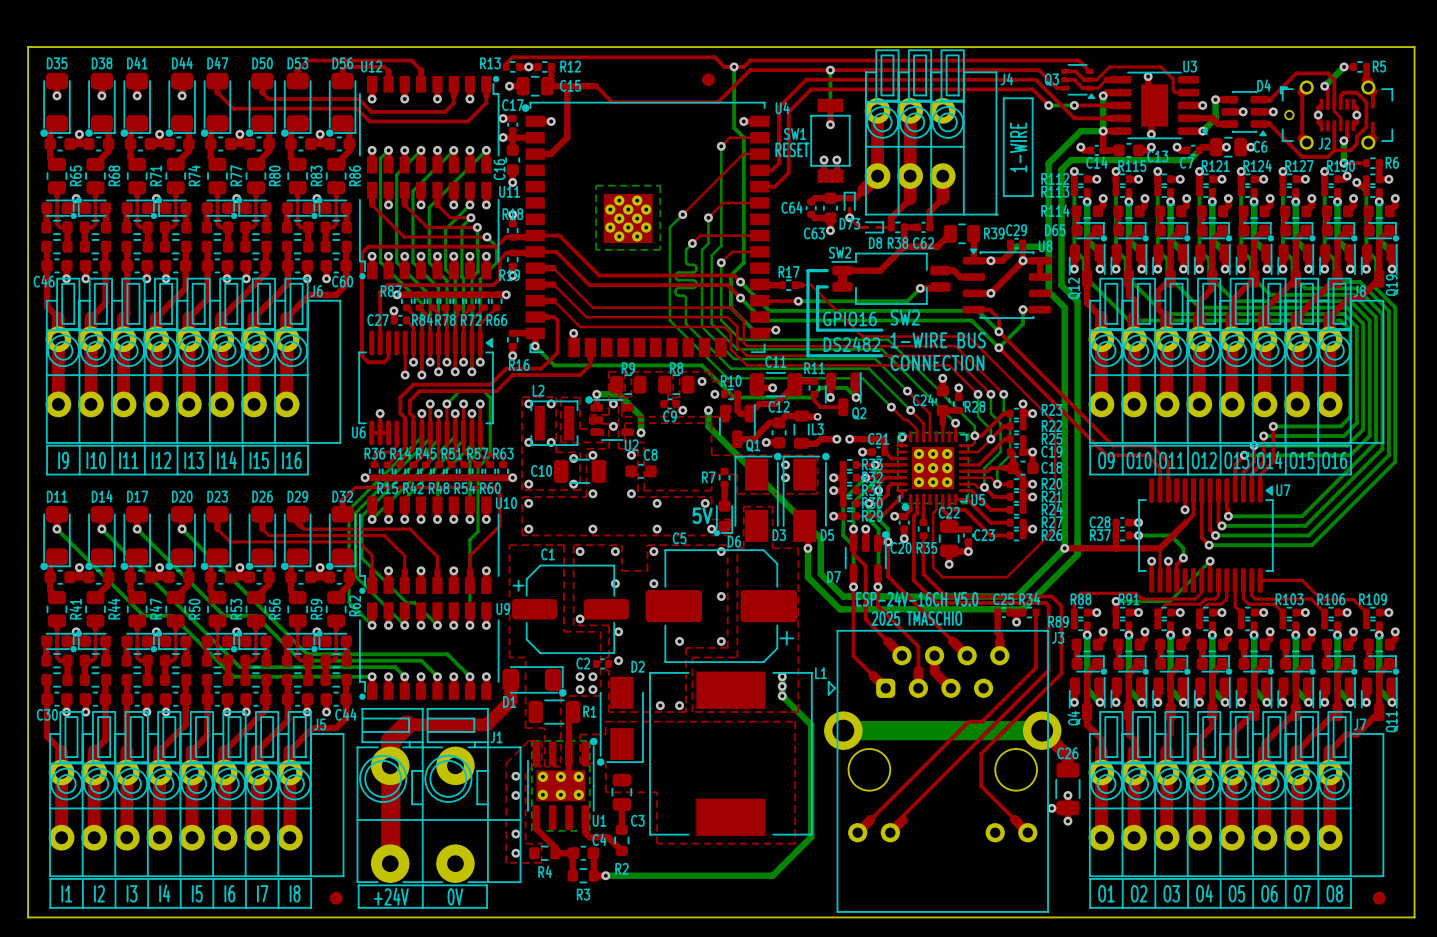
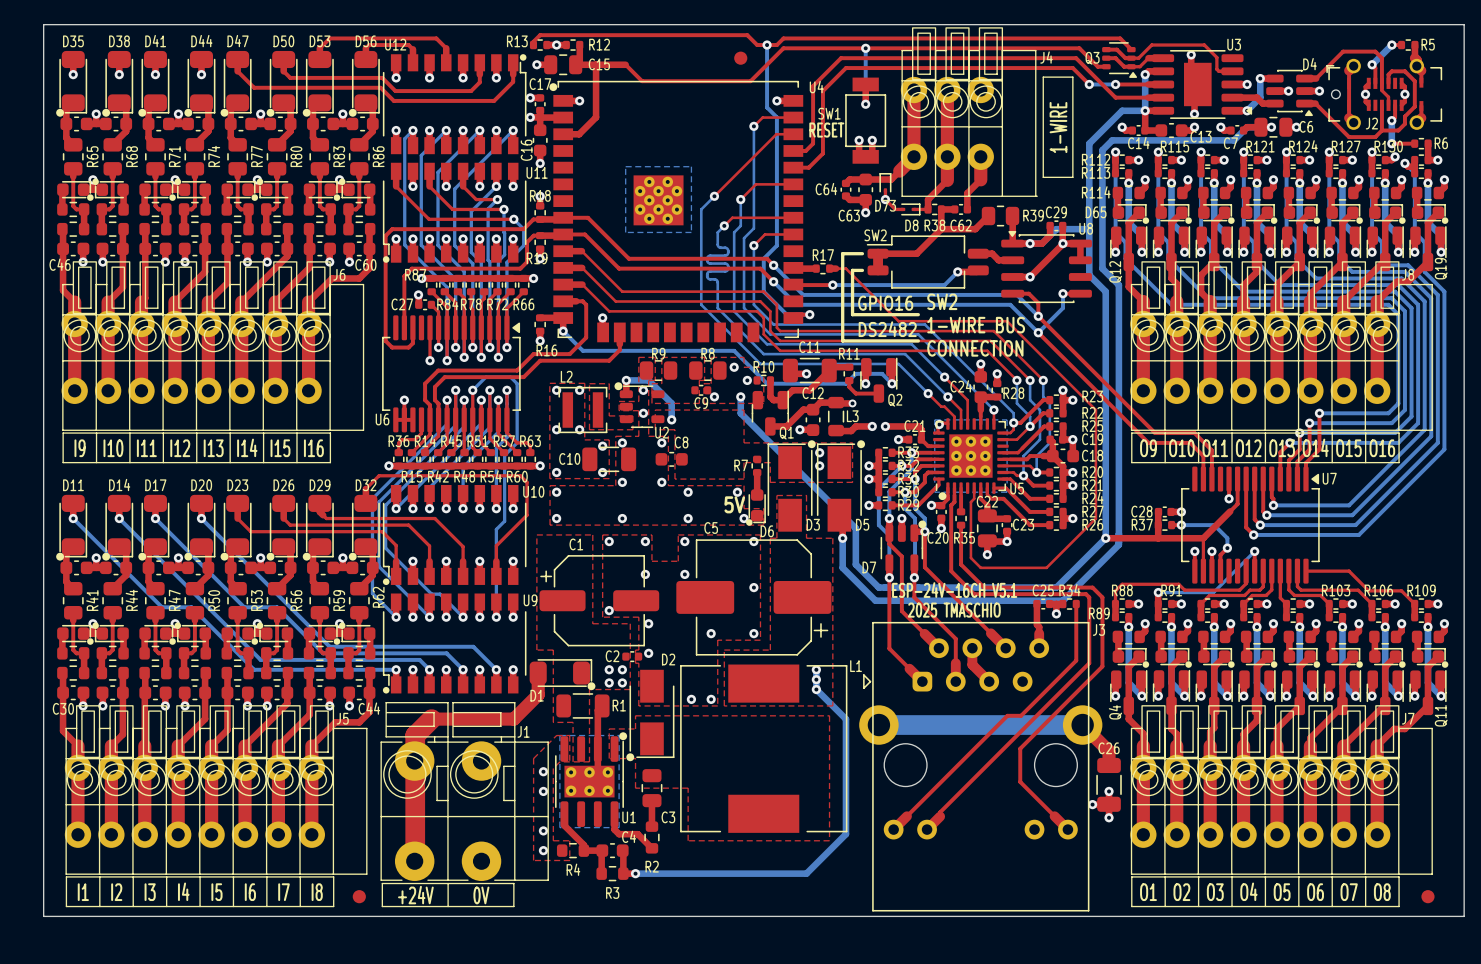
text: ESP-24V-16CH V5.0 (917, 598) -> ESP-24V-16CH V5.1 (954, 590)

